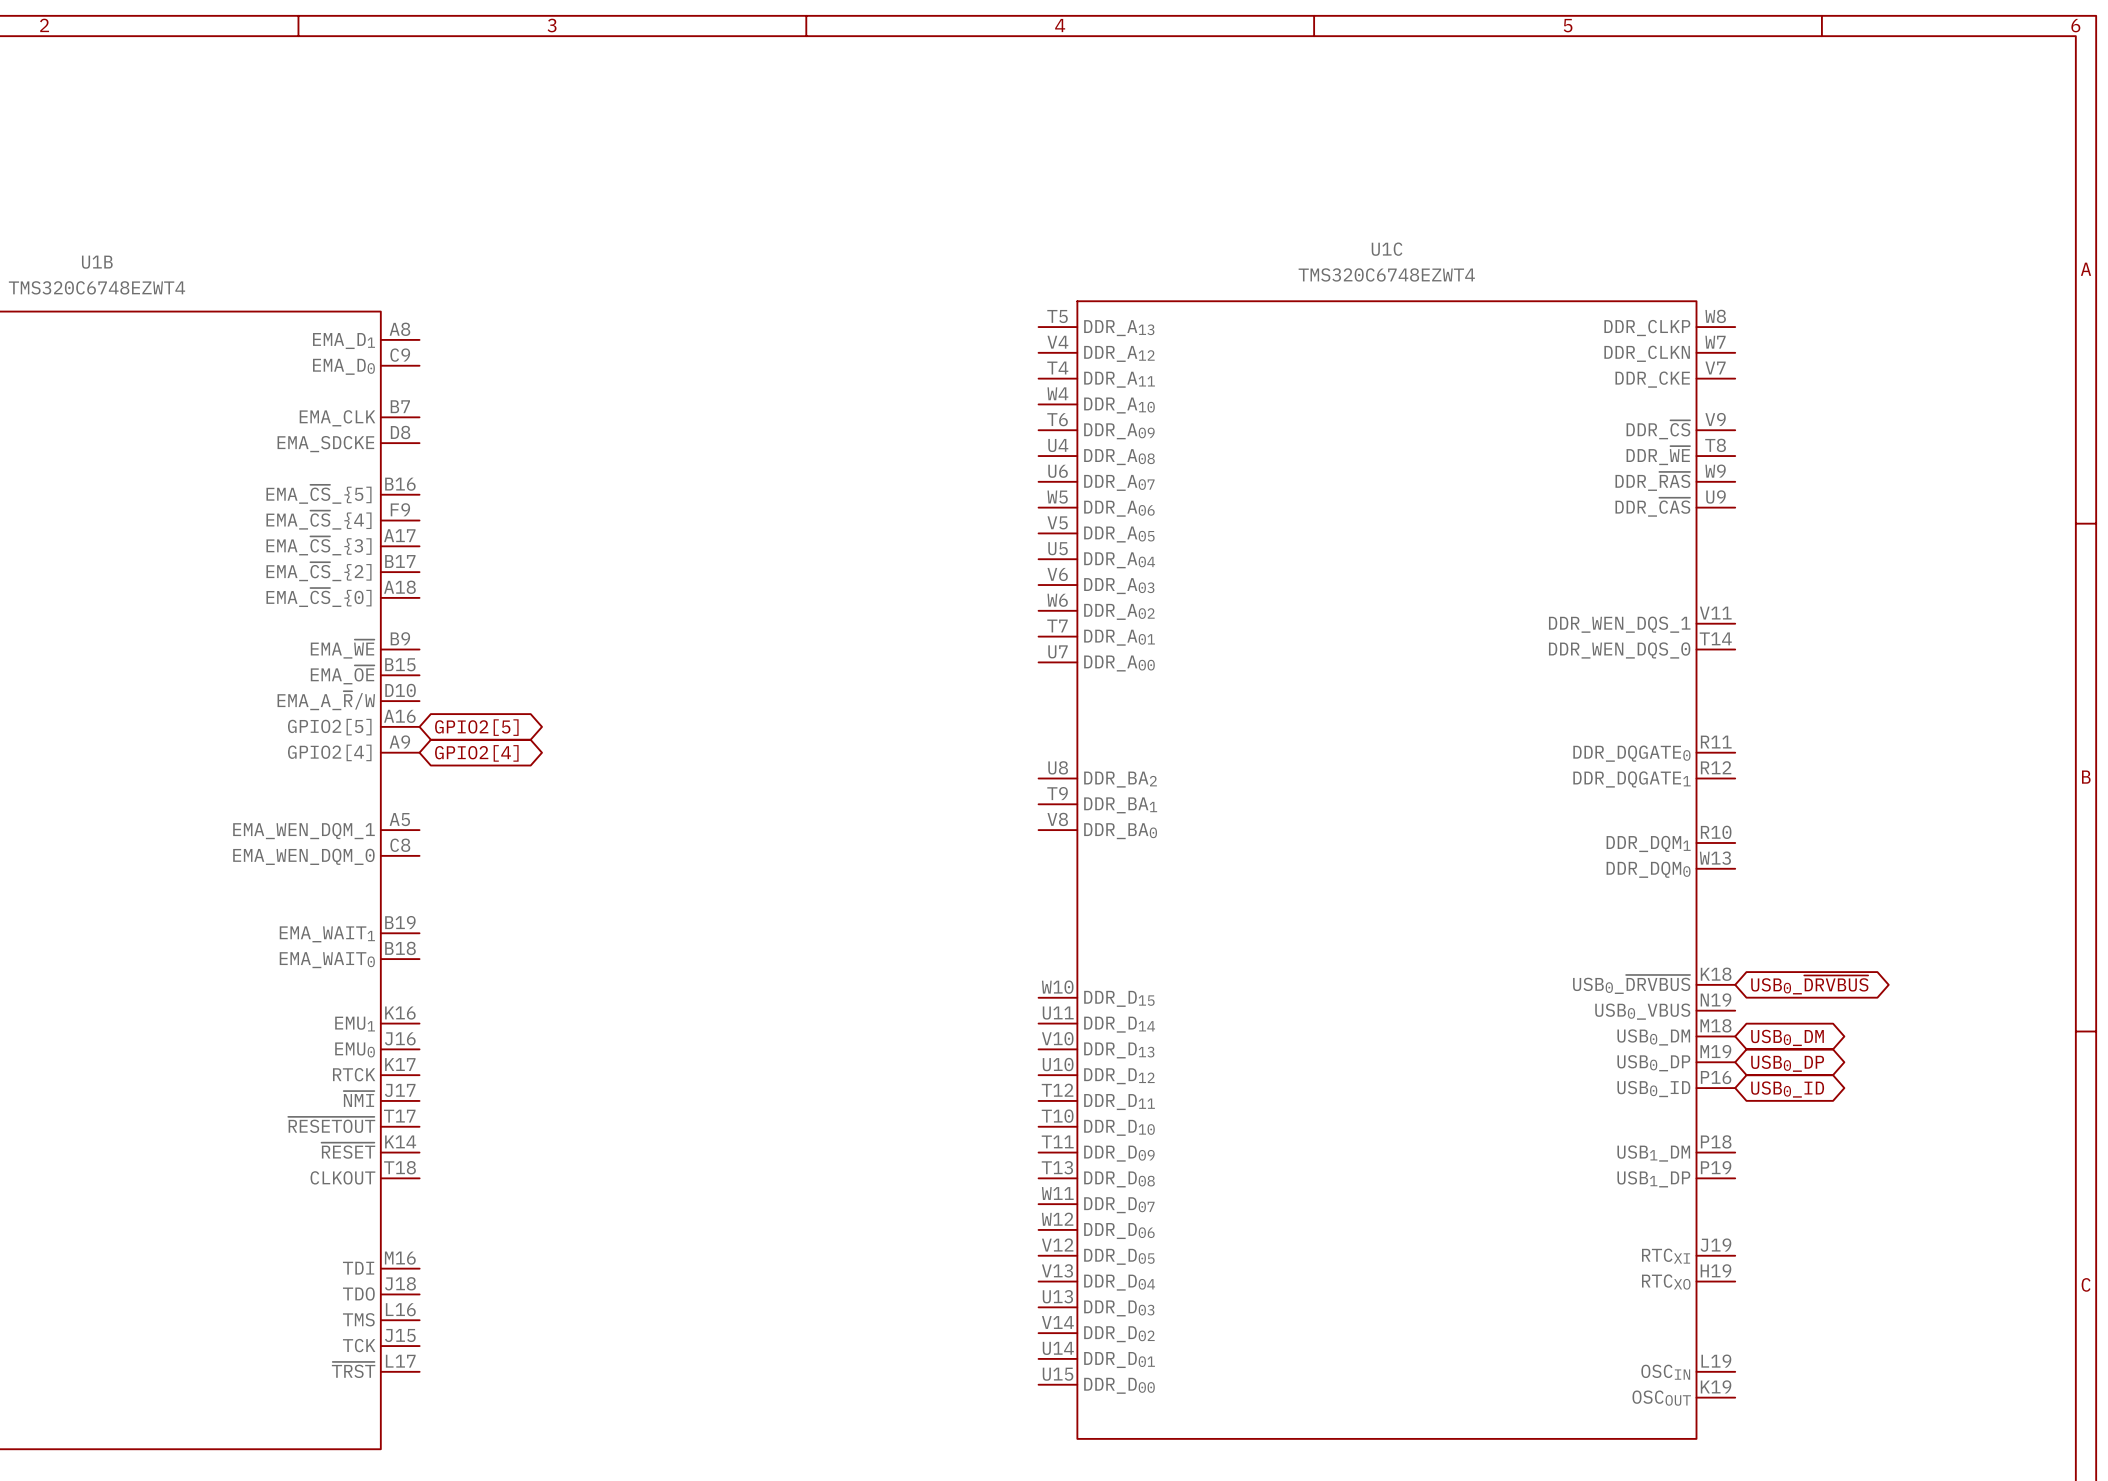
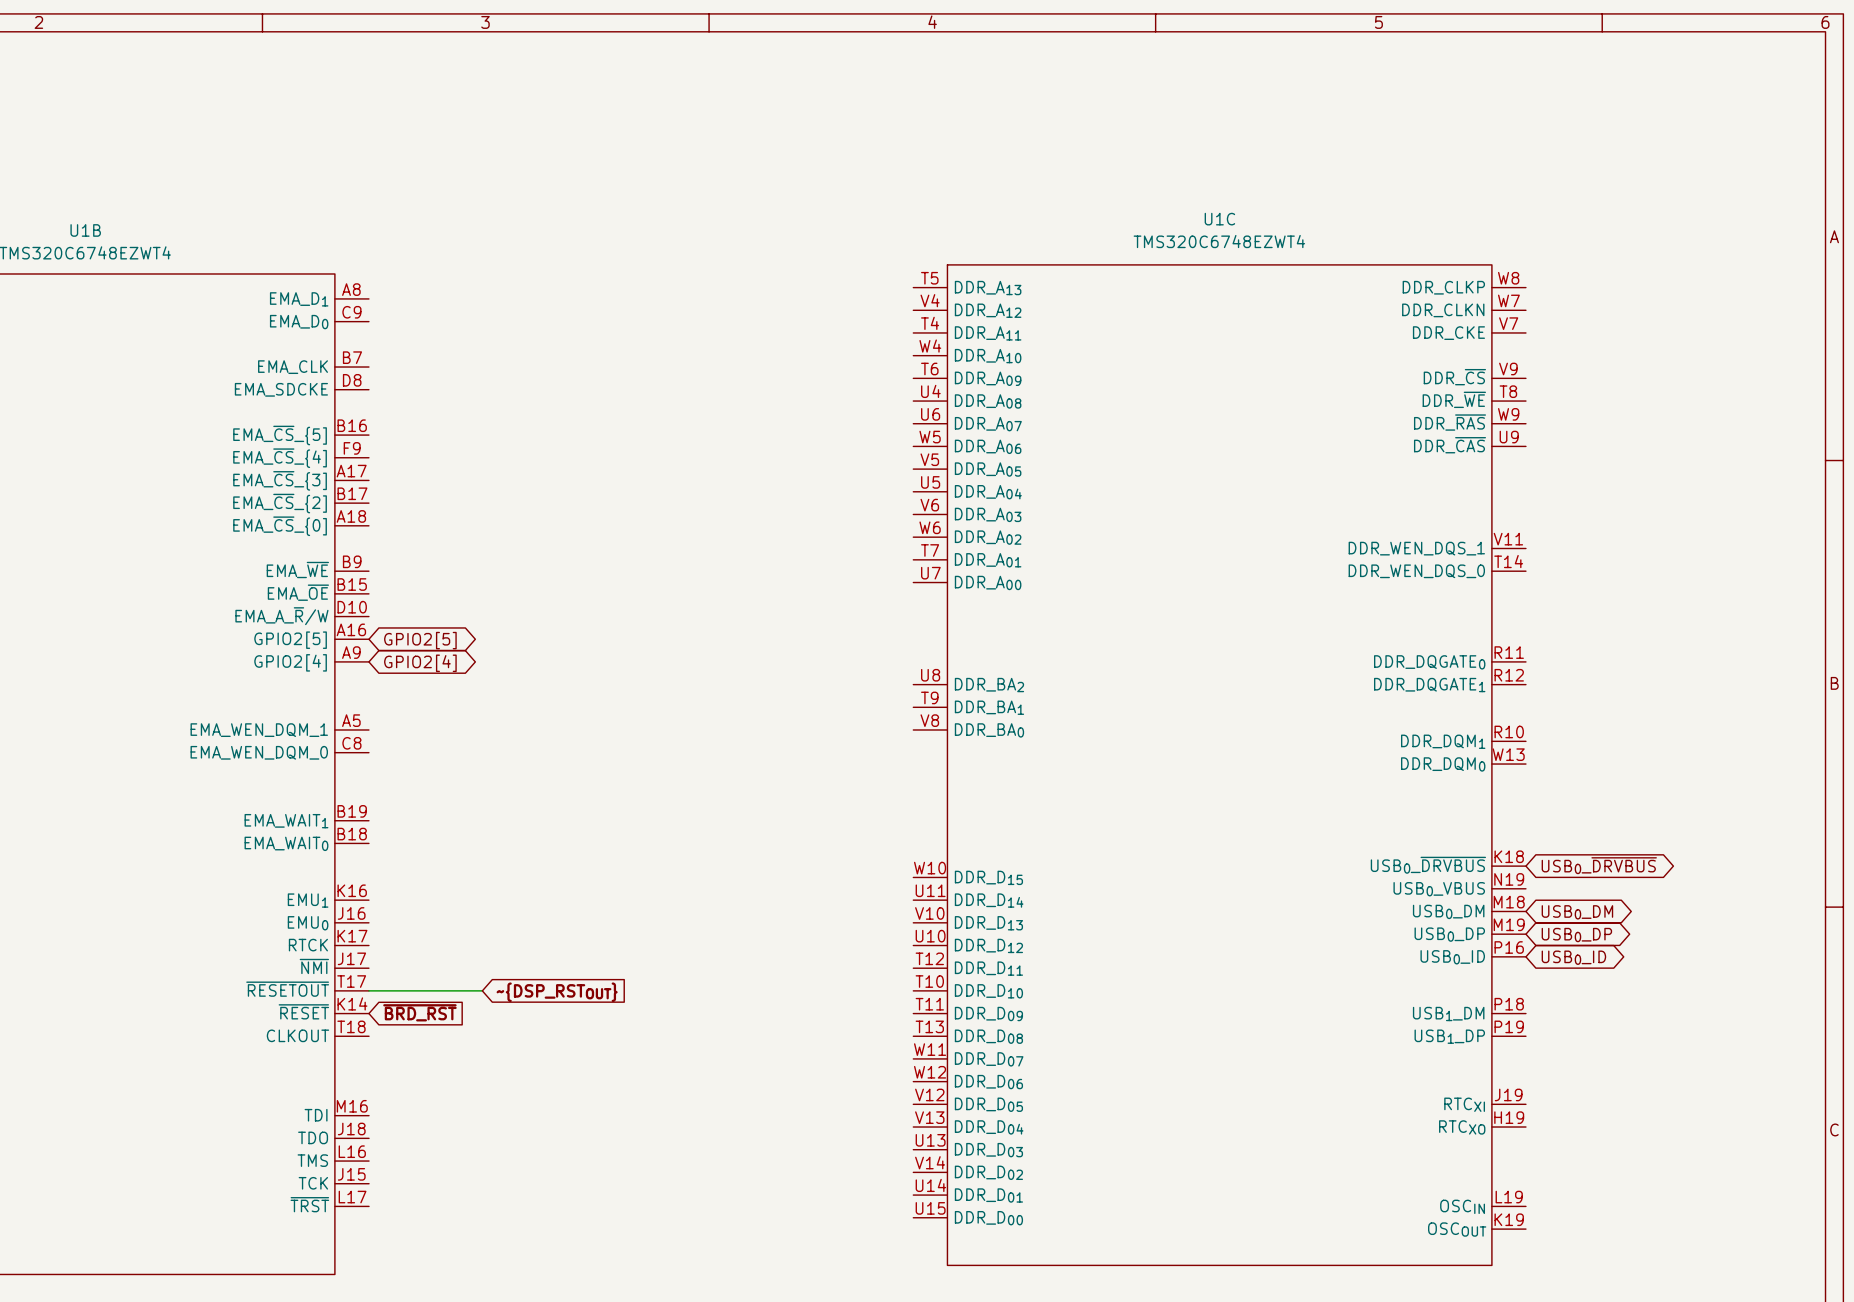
wire: none -> (368, 990) (482, 990)
global label: none -> ~{DSP_RSTOUT} (557, 992)
global label: none -> ~{BRD_RST} (419, 1012)

